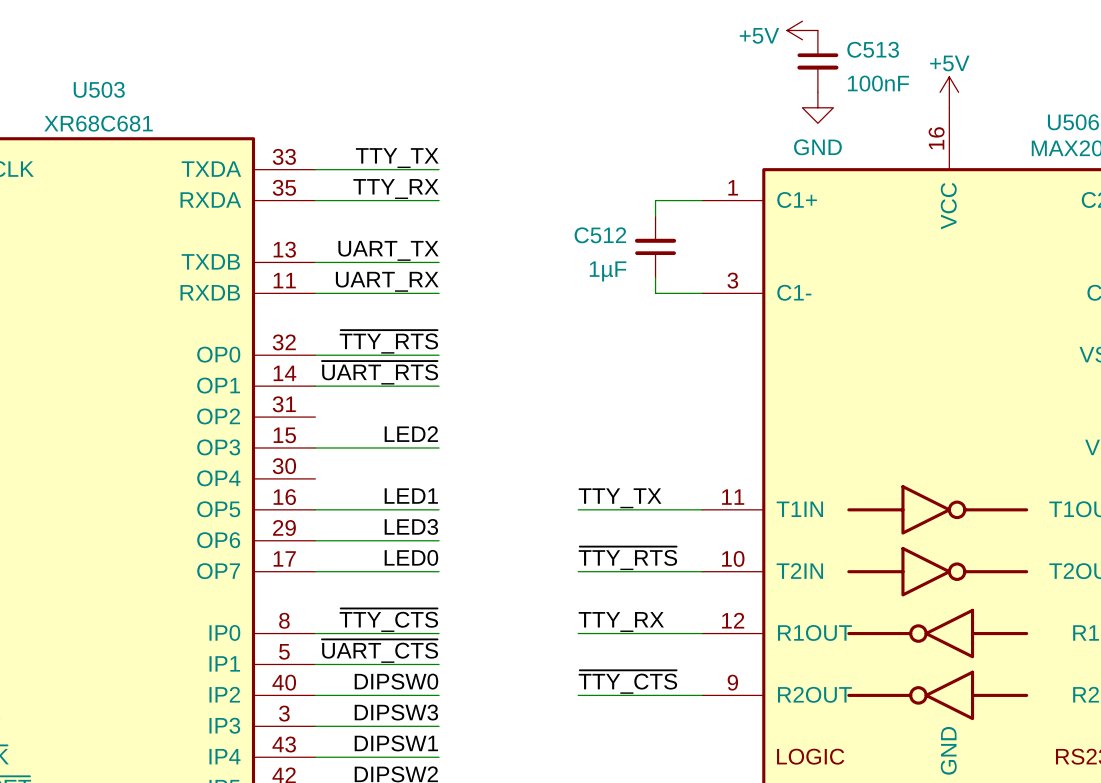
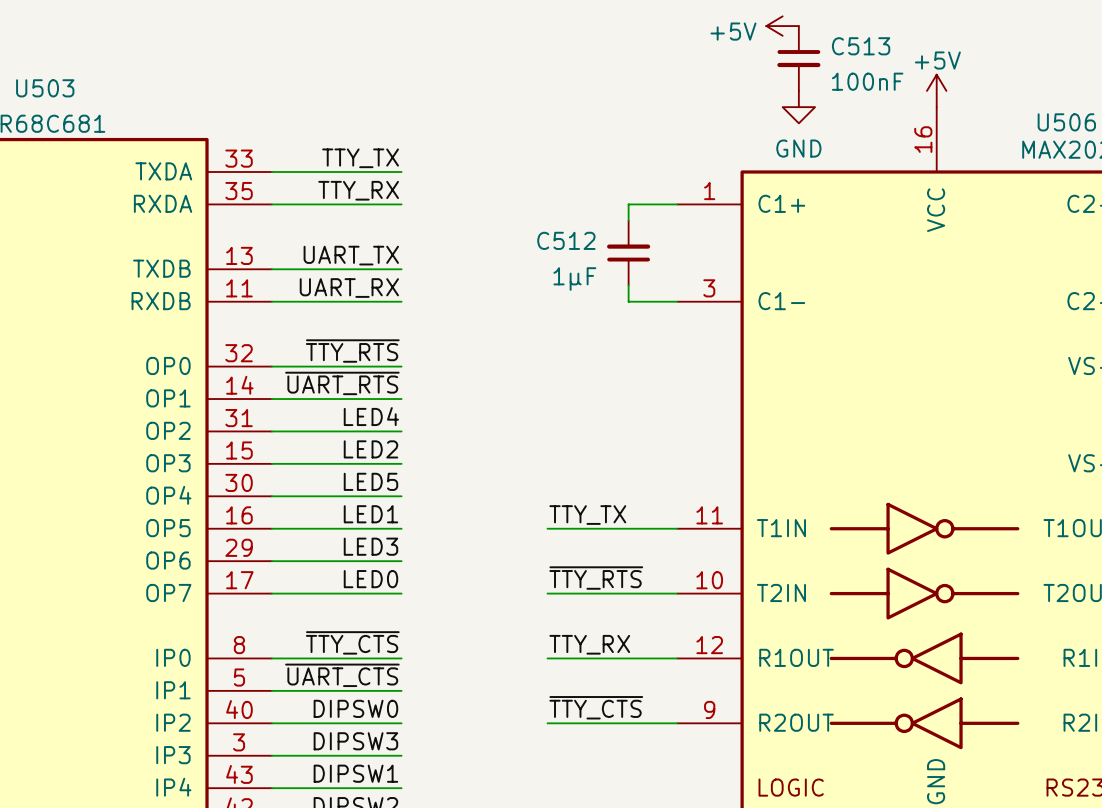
label: none -> LED4 (371, 416)
wire: none -> (271, 431) (401, 431)
label: none -> LED5 (370, 481)
wire: none -> (271, 496) (401, 496)

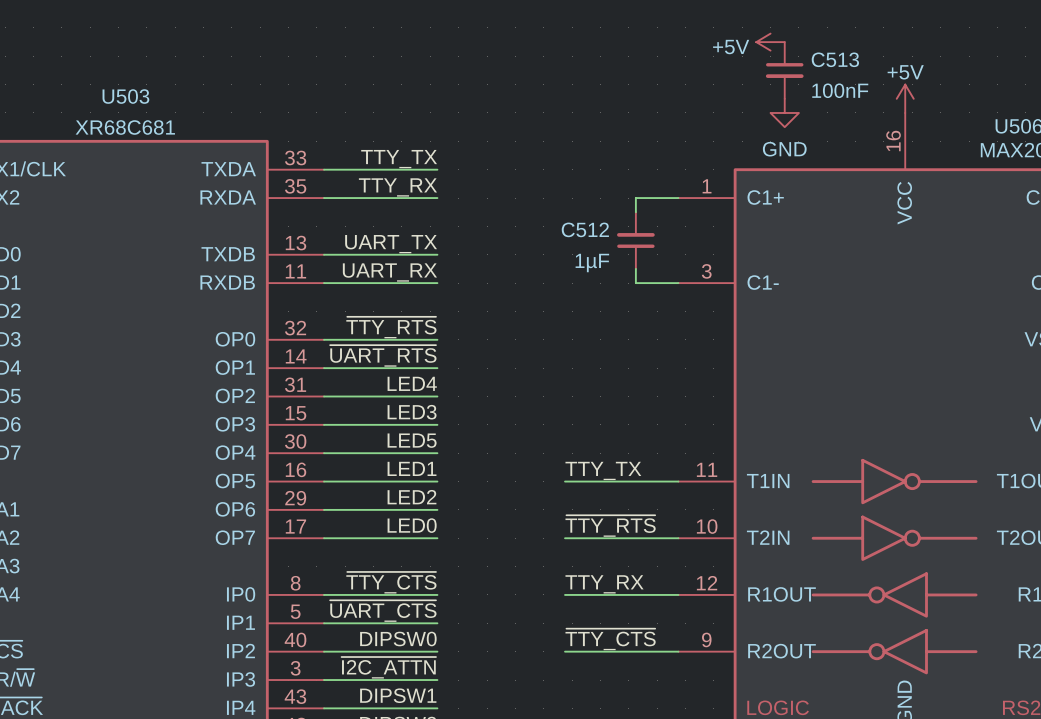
label: LED2 (370, 449) -> LED3 (412, 412)
label: LED3 (370, 546) -> LED2 (411, 497)
label: DIPSW3 (355, 741) -> ~{I2C_ATTN} (388, 667)

